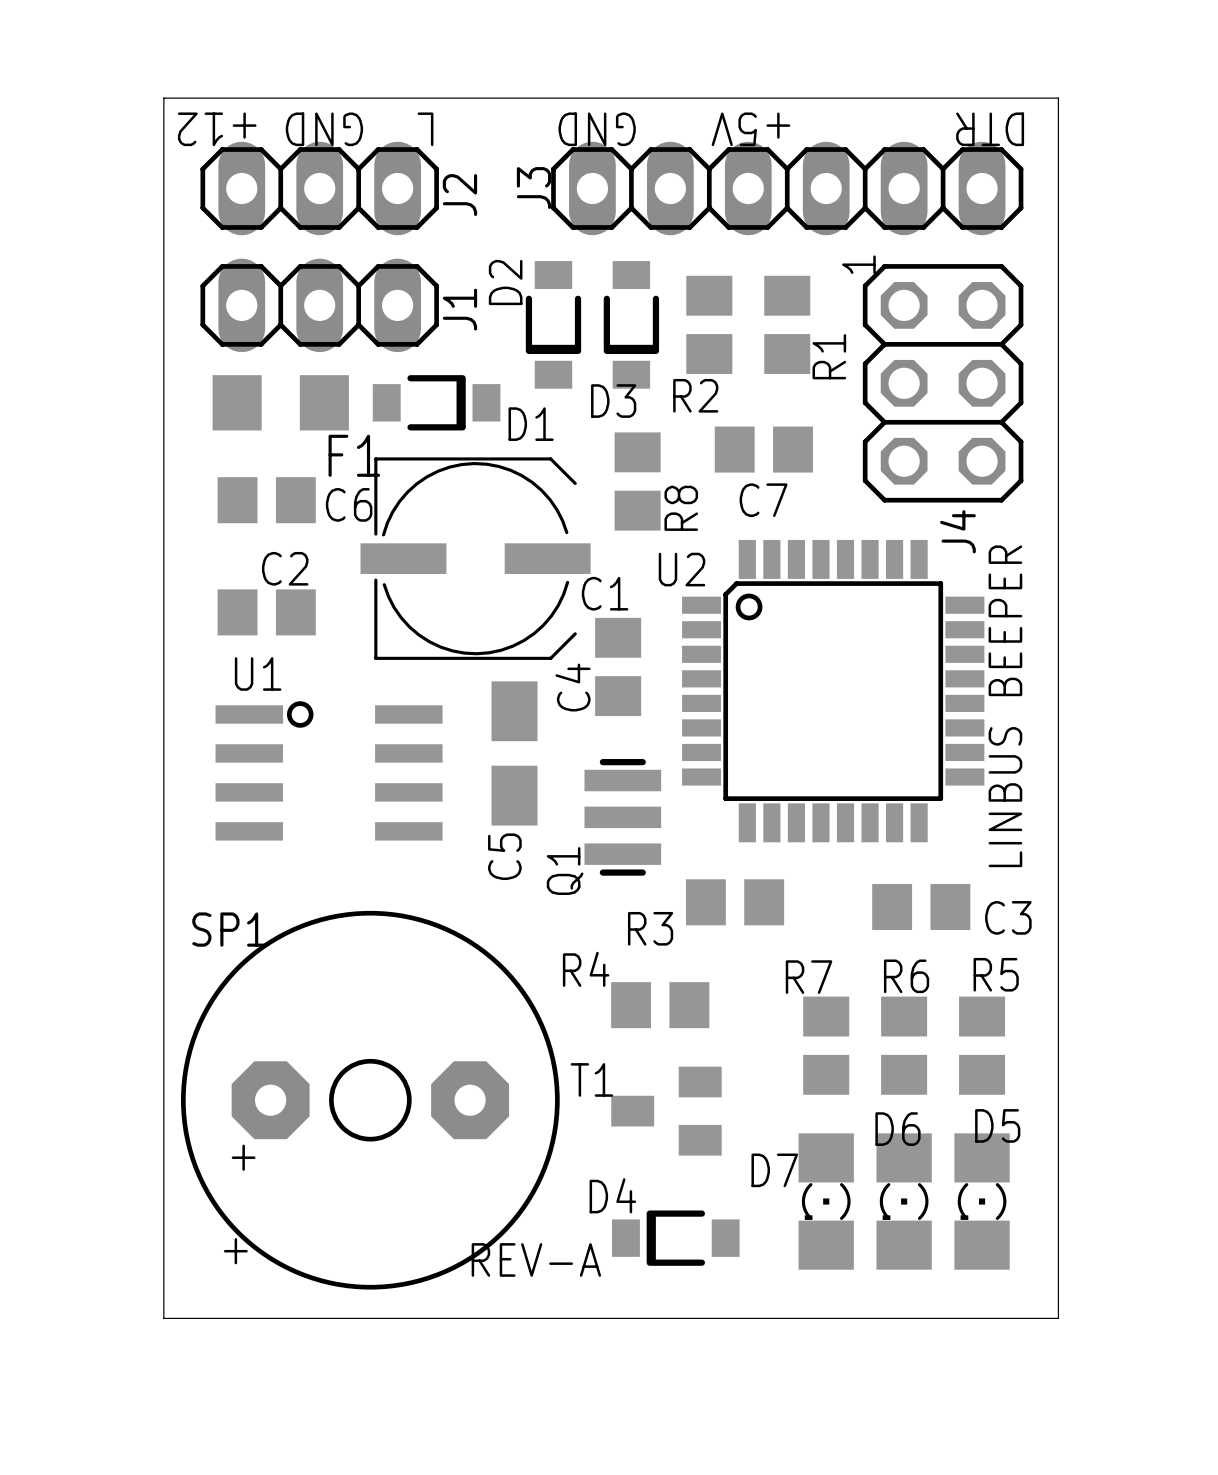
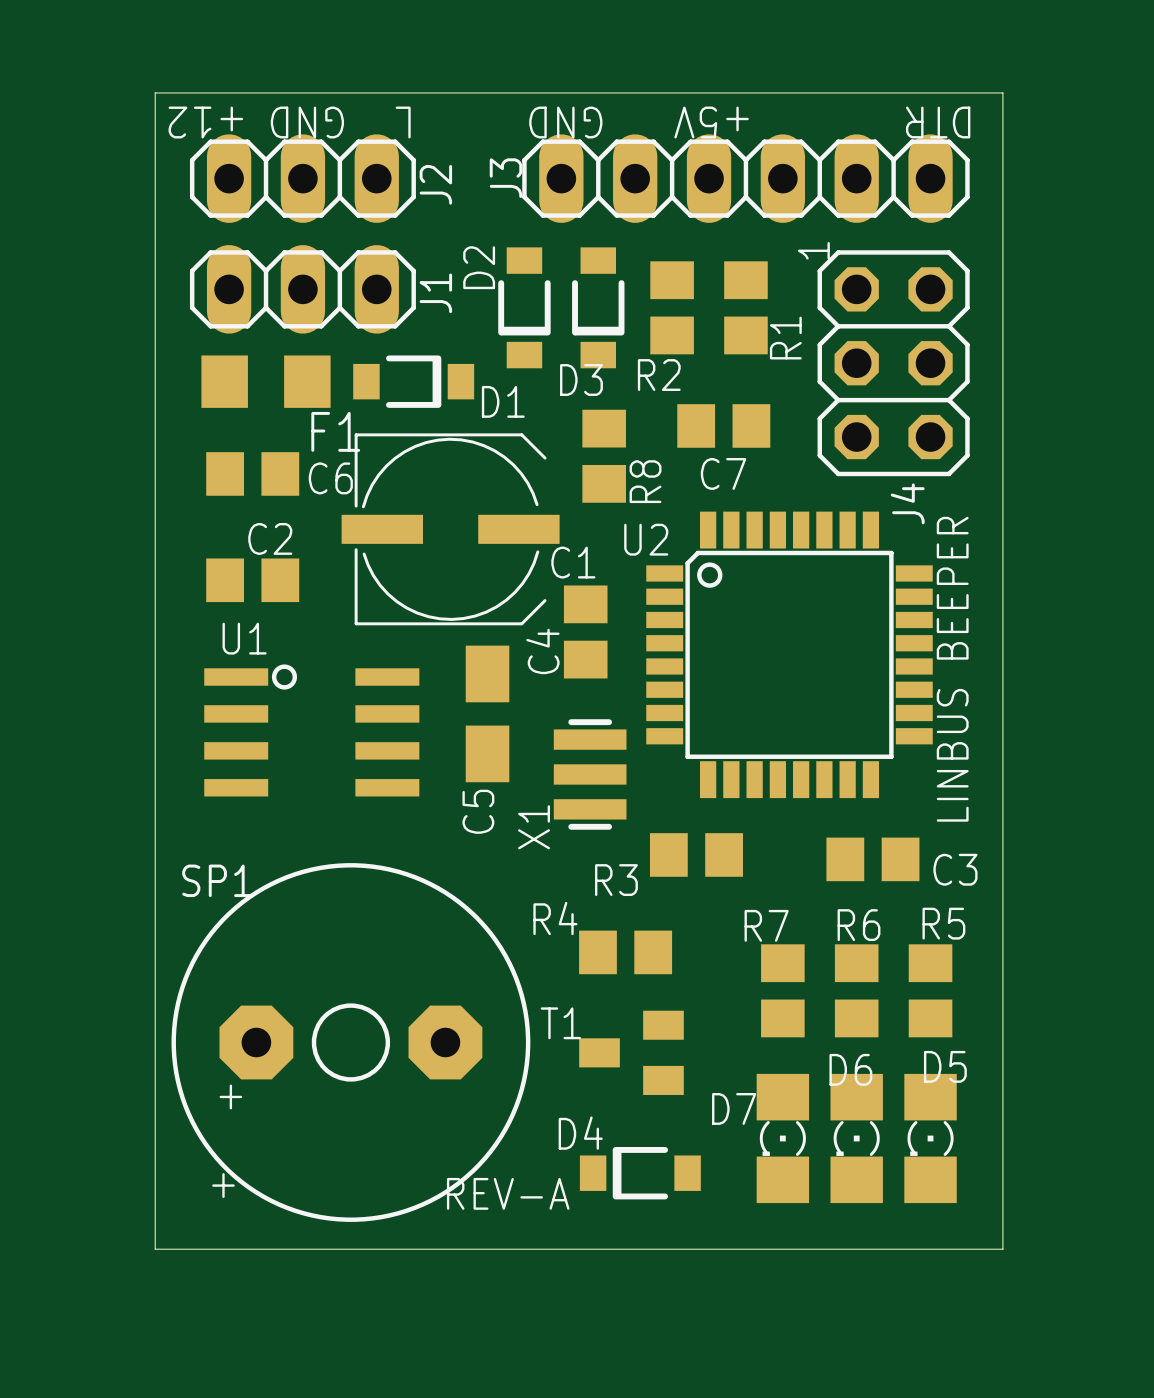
Q1 name: Q1 (565, 871) -> X1 (534, 827)

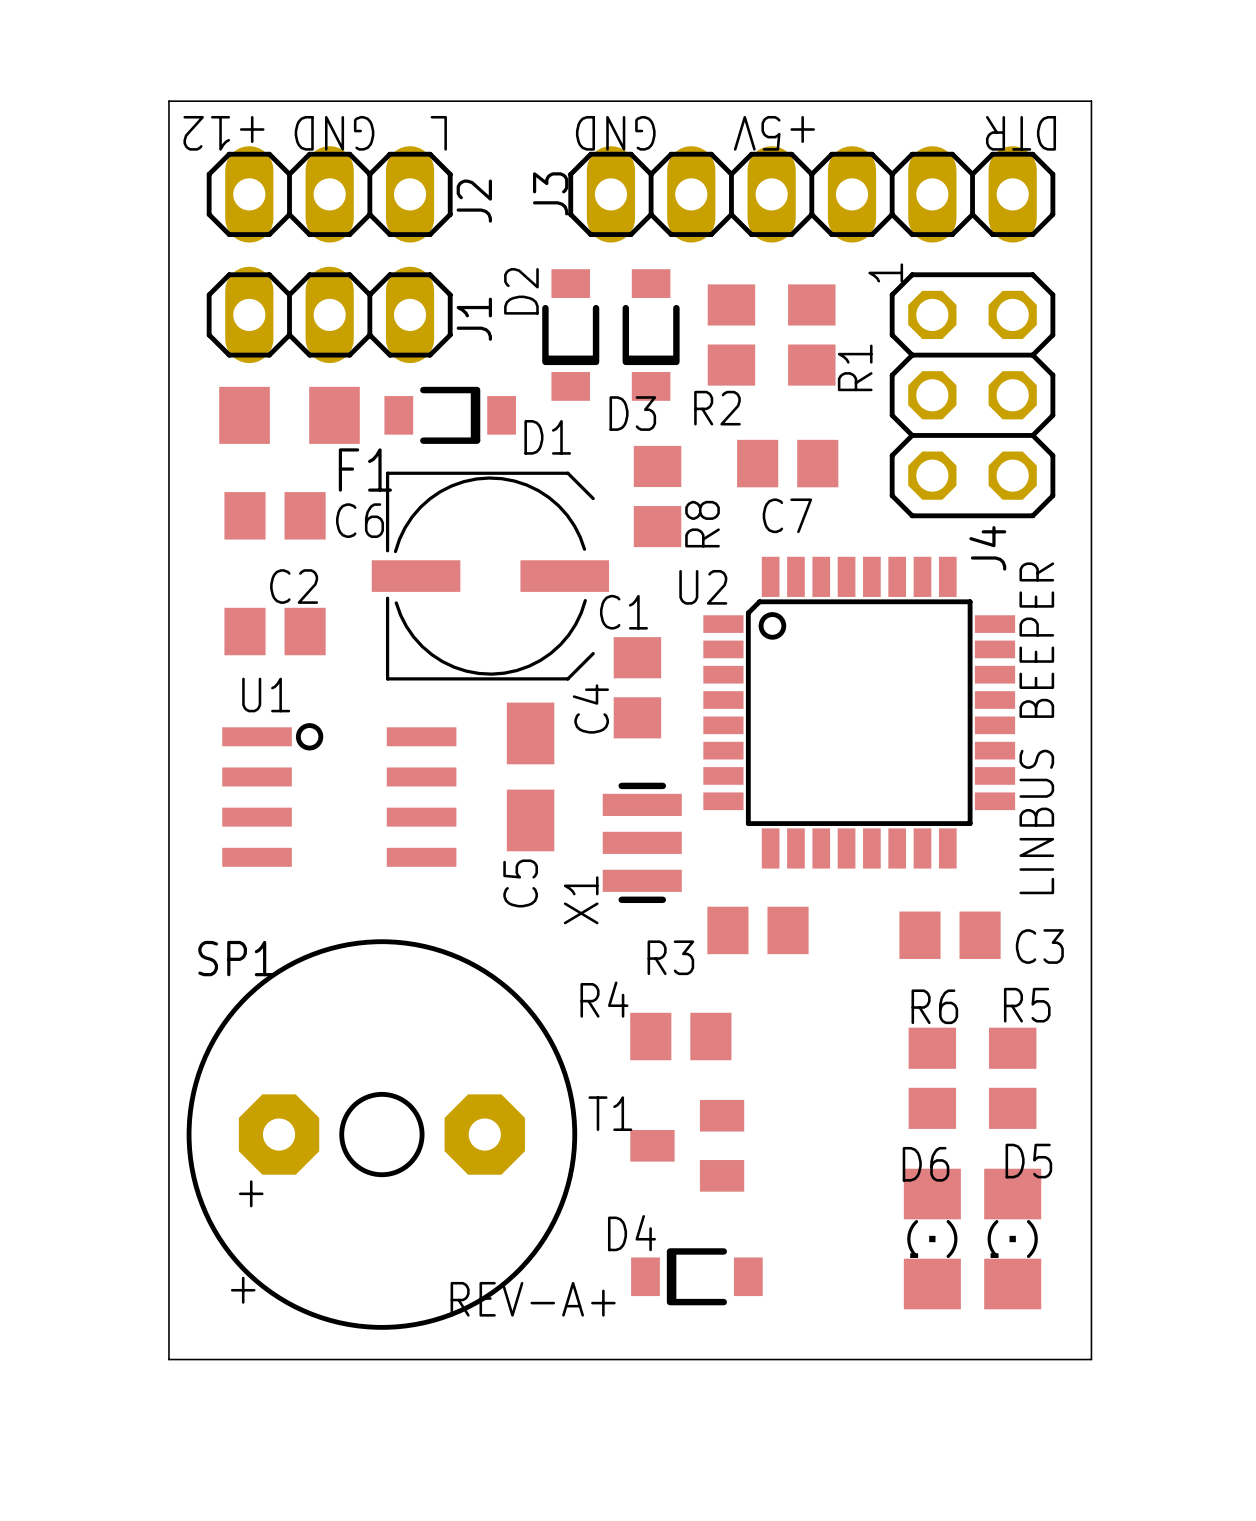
R7: (782, 990) -> none
D7: (782, 1138) -> none
text: REV-A (508, 1193) -> REV-A+ (533, 1299)

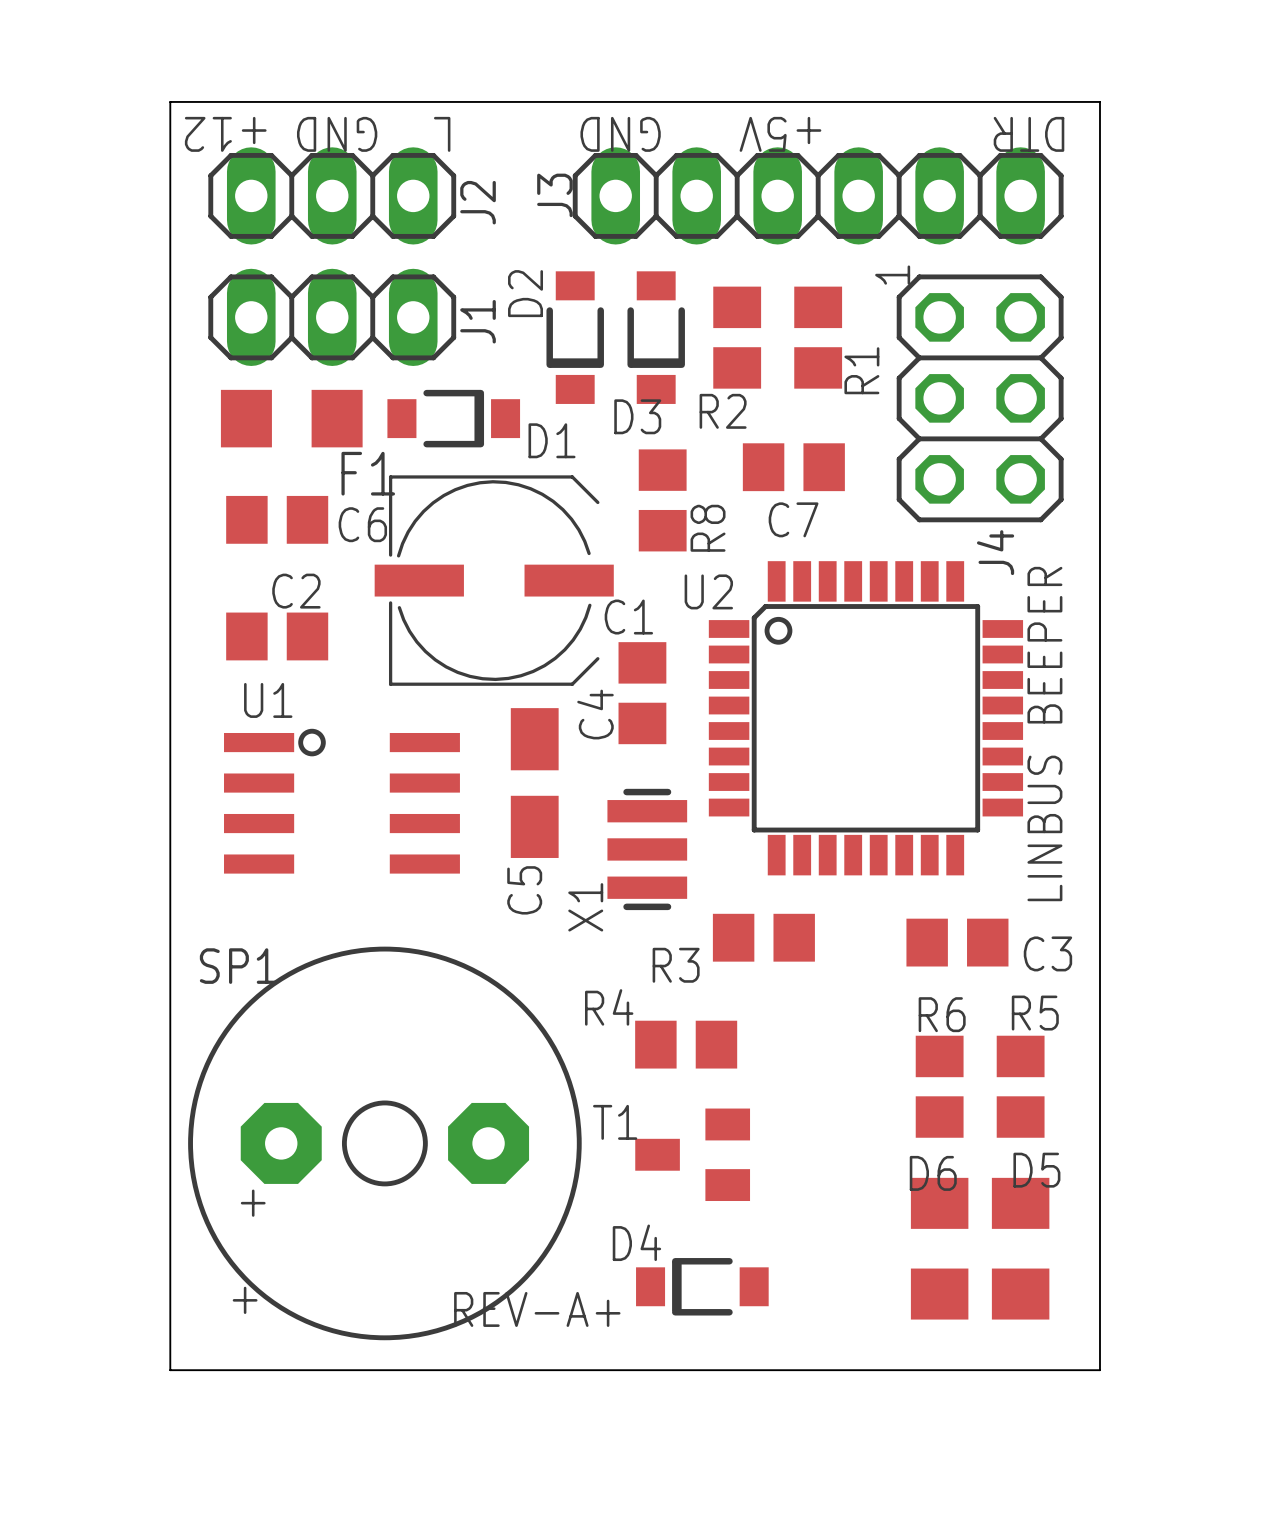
D6 footprint: [903, 1168, 961, 1310] -> [910, 1177, 969, 1320]
D5 footprint: [984, 1168, 1042, 1310] -> [991, 1177, 1050, 1320]

